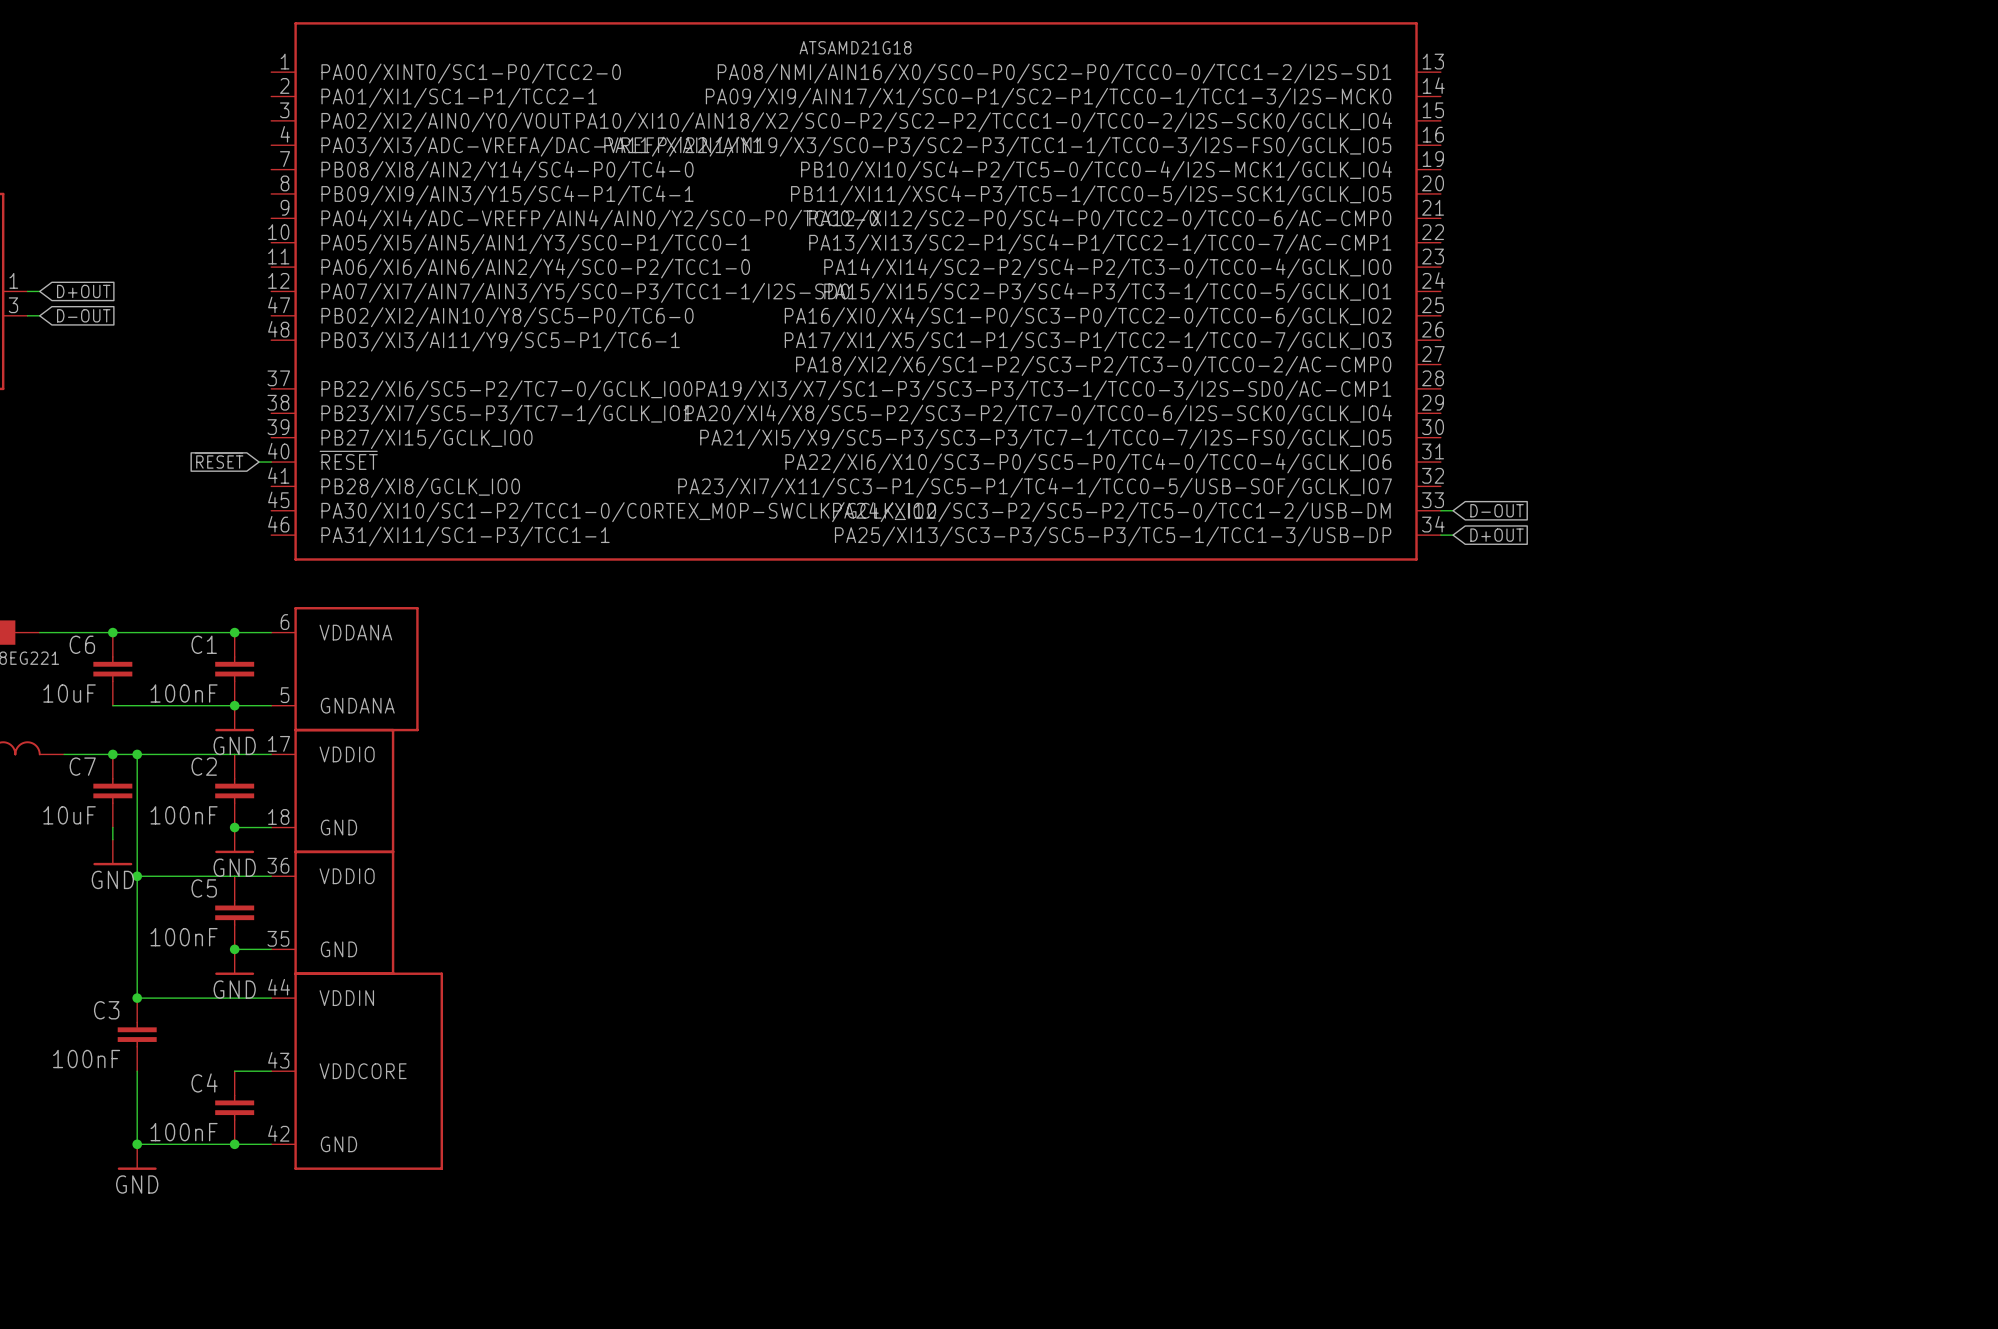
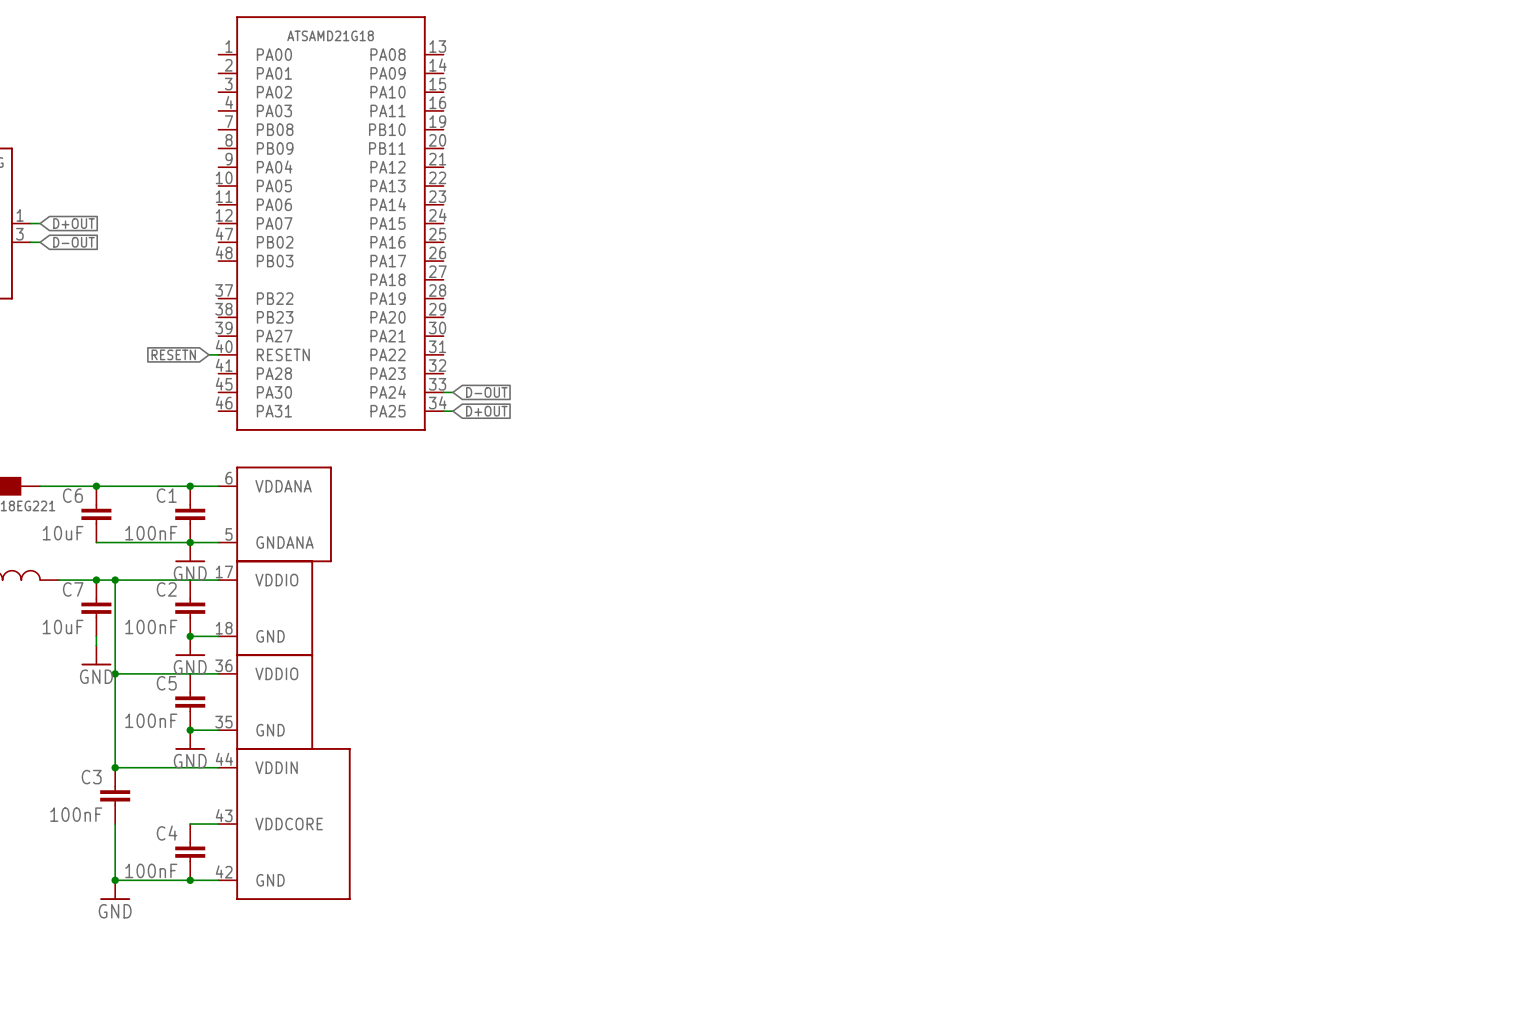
part: none -> (330, 223)
part: (856, 291) -> none
global label: ~{RESET} (219, 460) -> RESETN (173, 354)
wire: none -> (443, 392) (452, 392)
global label: none -> D-OUT (486, 392)
wire: (1440, 510) (1453, 510) -> none
global label: D-OUT (1497, 510) -> none
wire: none -> (443, 411) (452, 411)
global label: none -> D+OUT (486, 411)
wire: (1440, 535) (1453, 535) -> none
global label: D+OUT (1497, 535) -> none

